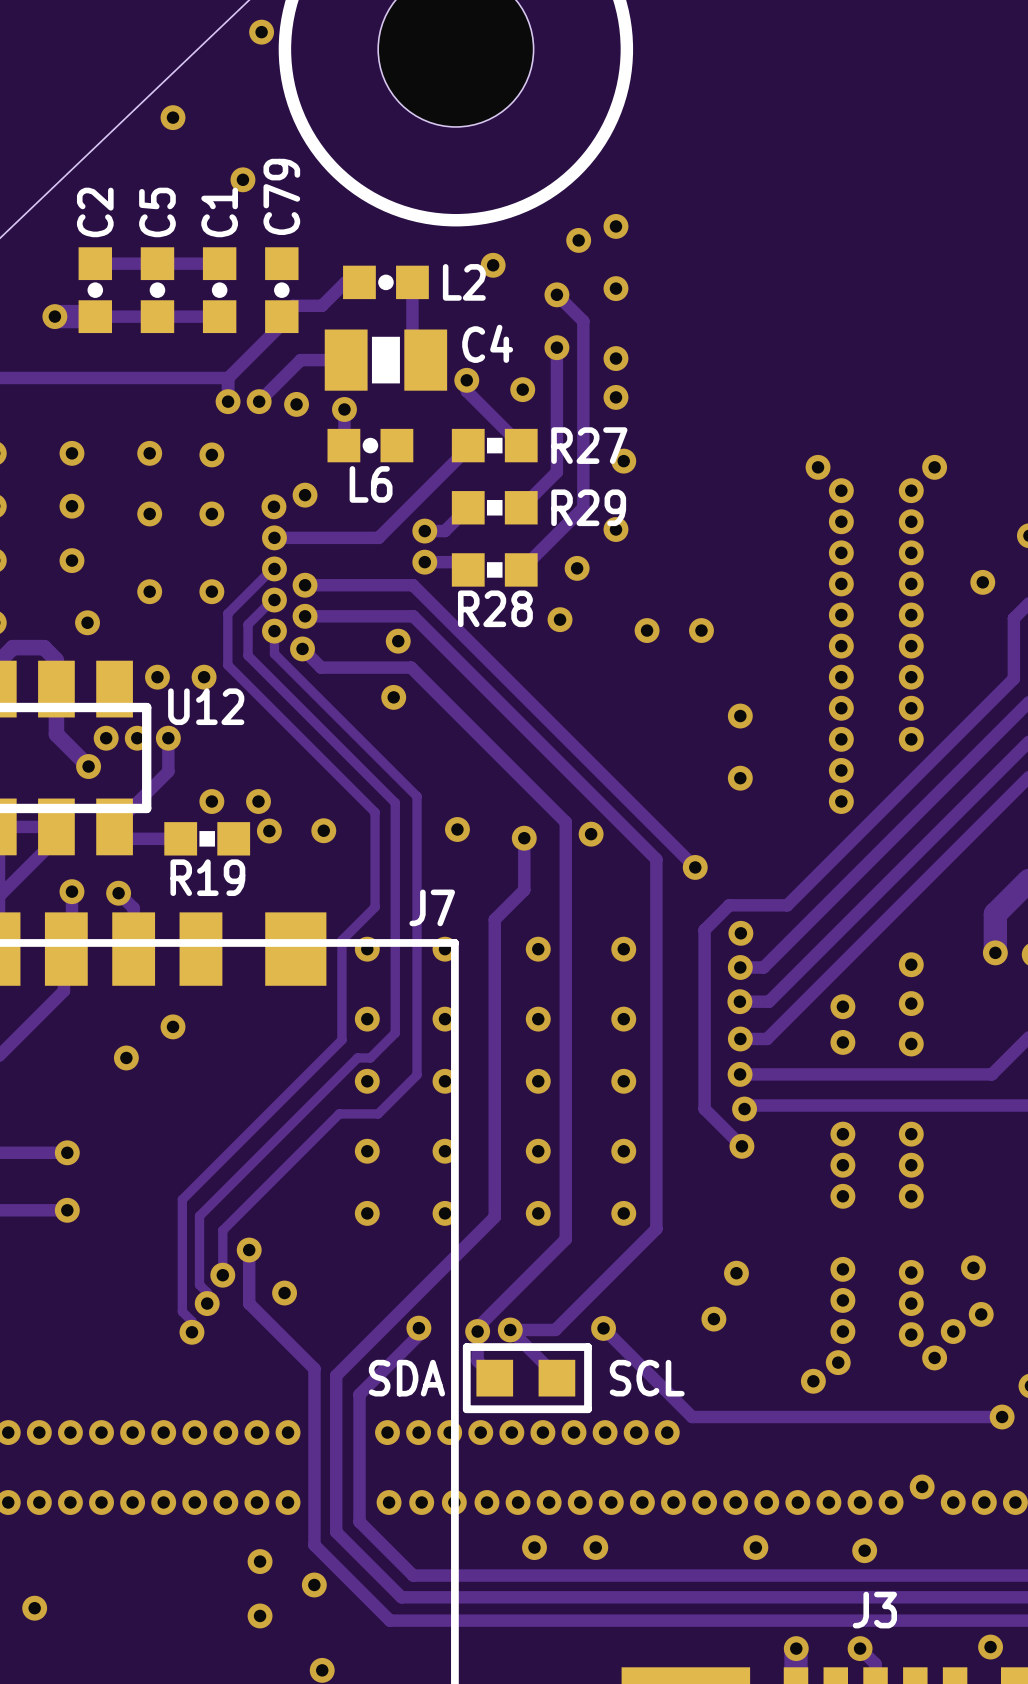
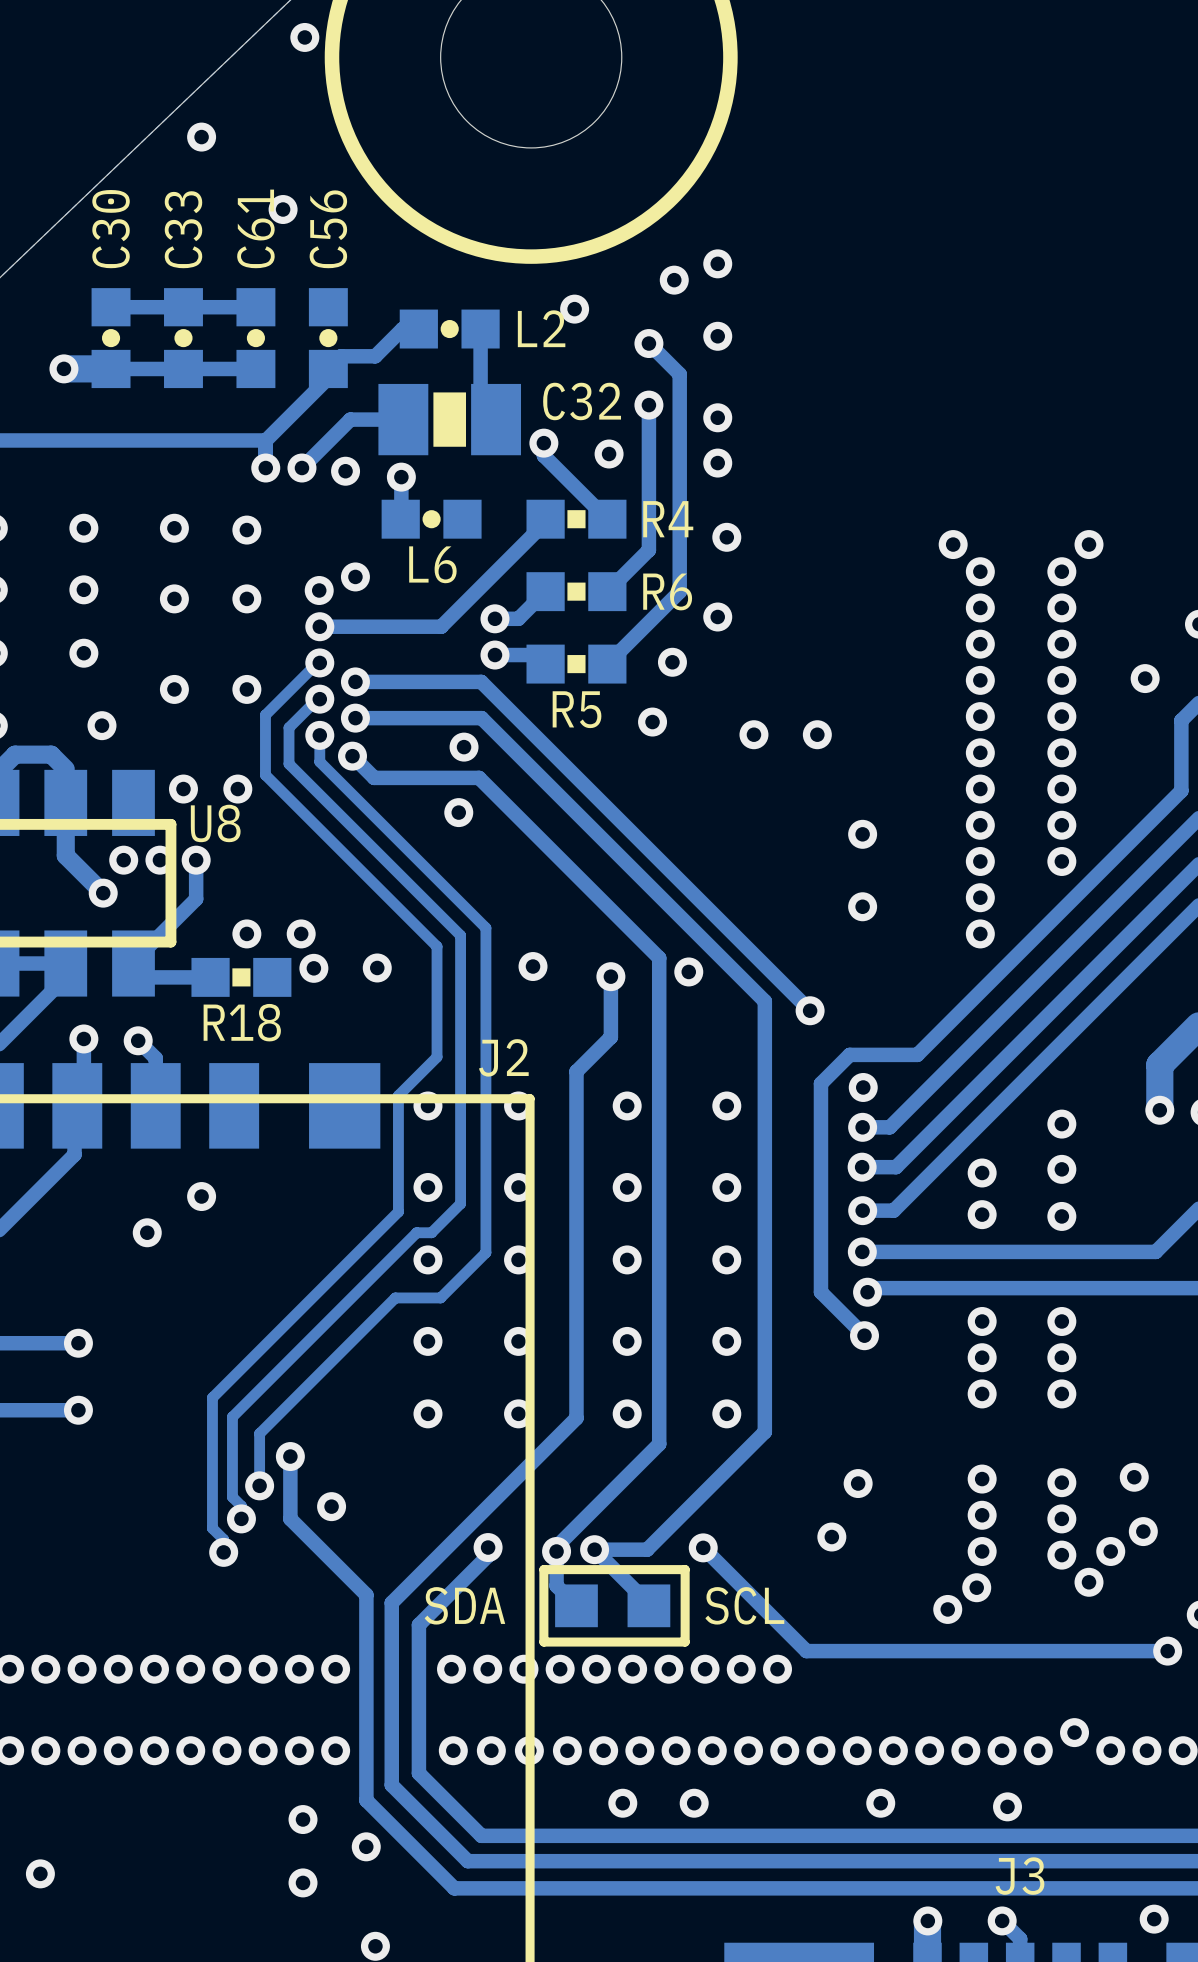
C79 name: C79 (281, 196) -> C56 (328, 229)
C2 name: C2 (95, 212) -> C30 (111, 229)
C5 name: C5 (157, 212) -> C33 (183, 229)
C1 name: C1 (219, 212) -> C61 (255, 228)
C4 name: C4 (487, 343) -> C32 (582, 401)
R27 name: R27 (589, 445) -> R4 (668, 519)
R29 name: R29 (588, 507) -> R6 (667, 591)
R28 name: R28 (495, 608) -> R5 (577, 709)
U12 name: U12 (206, 706) -> U8 (215, 823)
R19 name: R19 (207, 877) -> R18 (242, 1022)
J7 name: J7 (432, 907) -> J2 (503, 1057)

